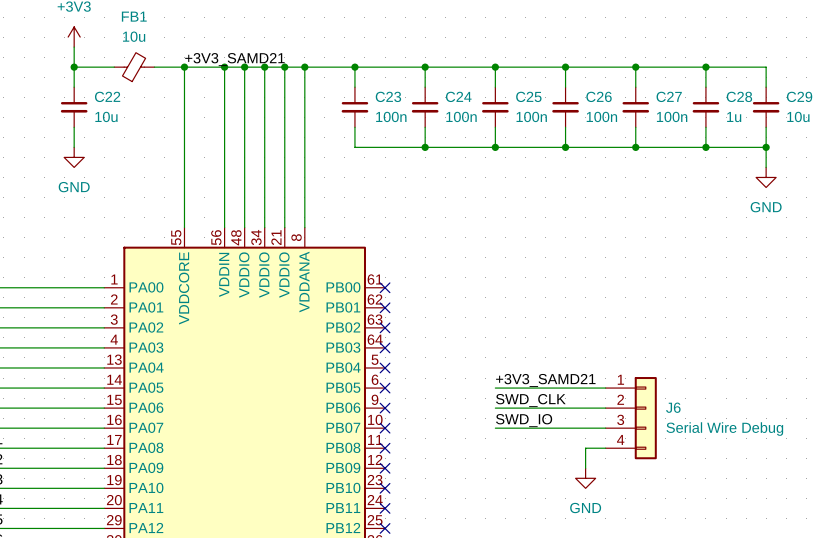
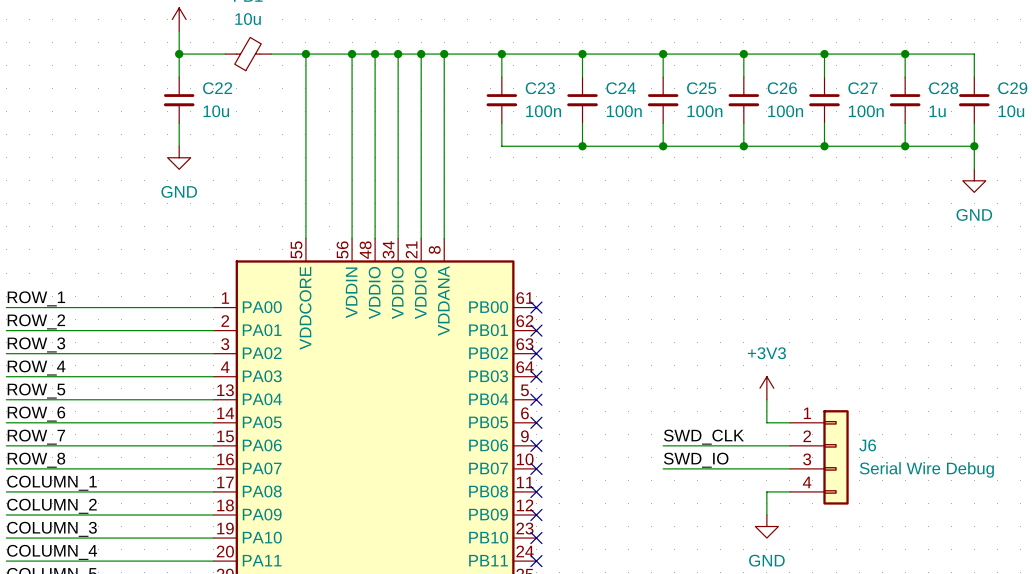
label: +3V3_SAMD21 (234, 59) -> none
power symbol: none -> +3V3 (766, 388)
label: +3V3_SAMD21 (545, 380) -> none
wire: (495, 388) (585, 388) -> (766, 399) (766, 422)

